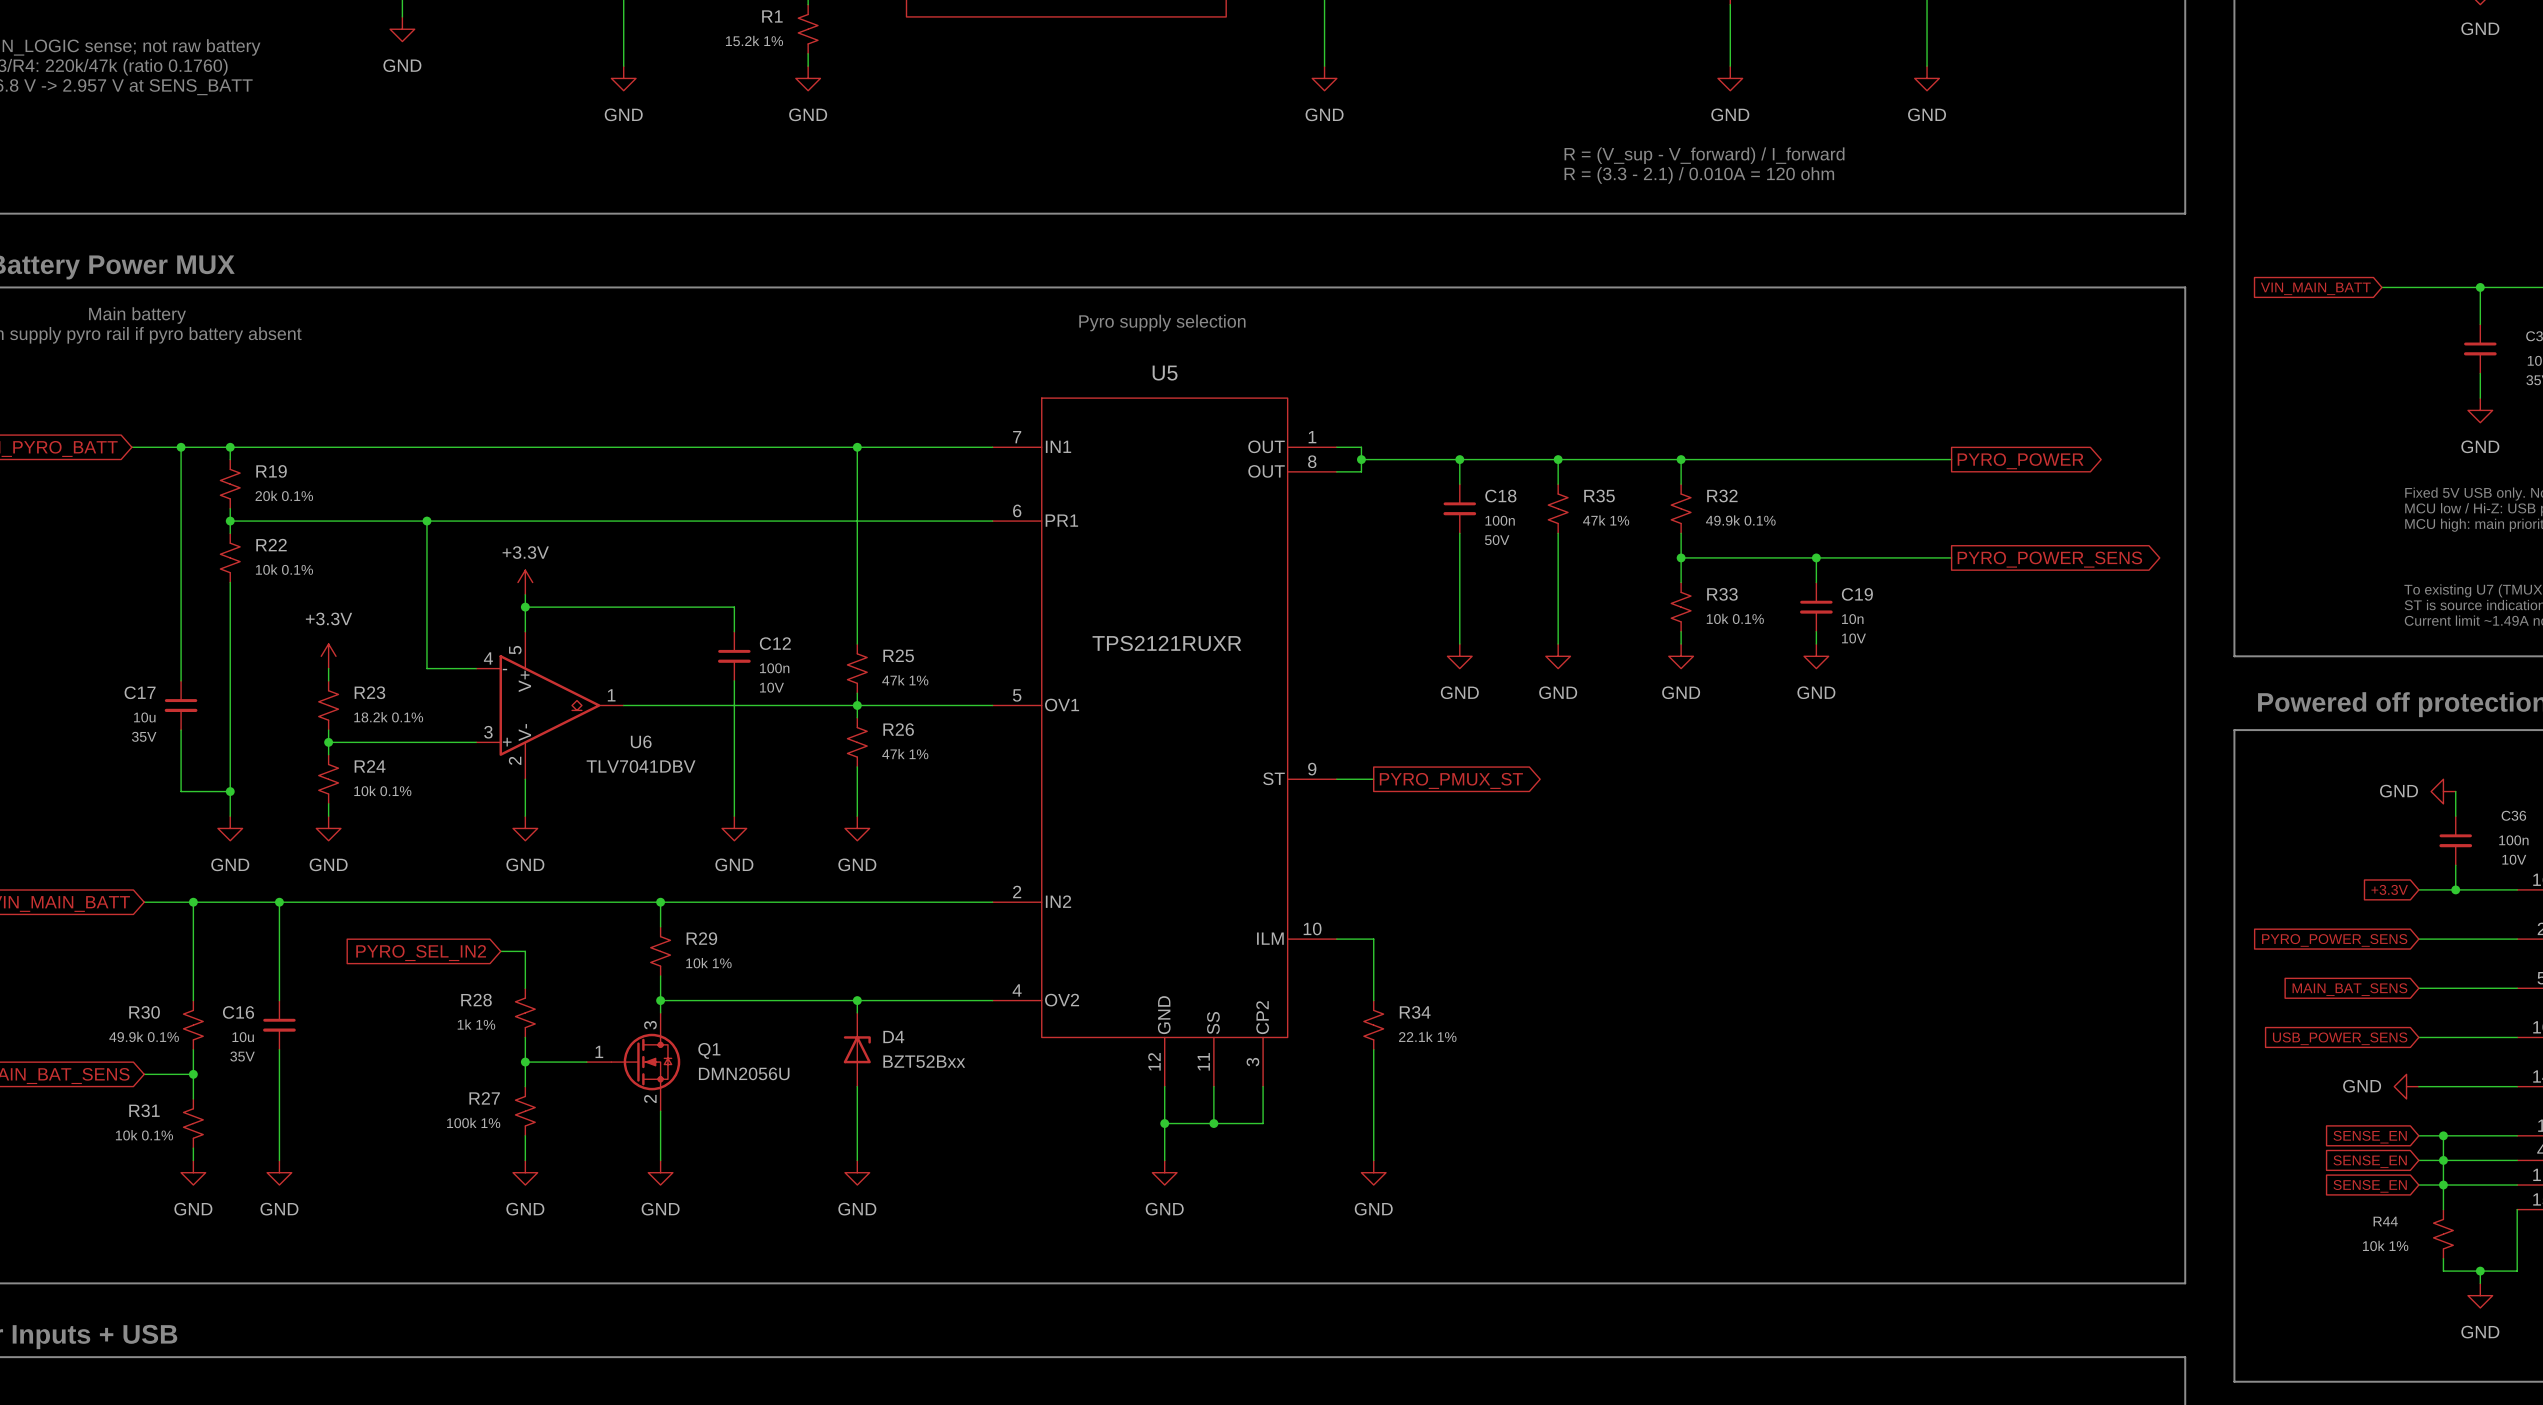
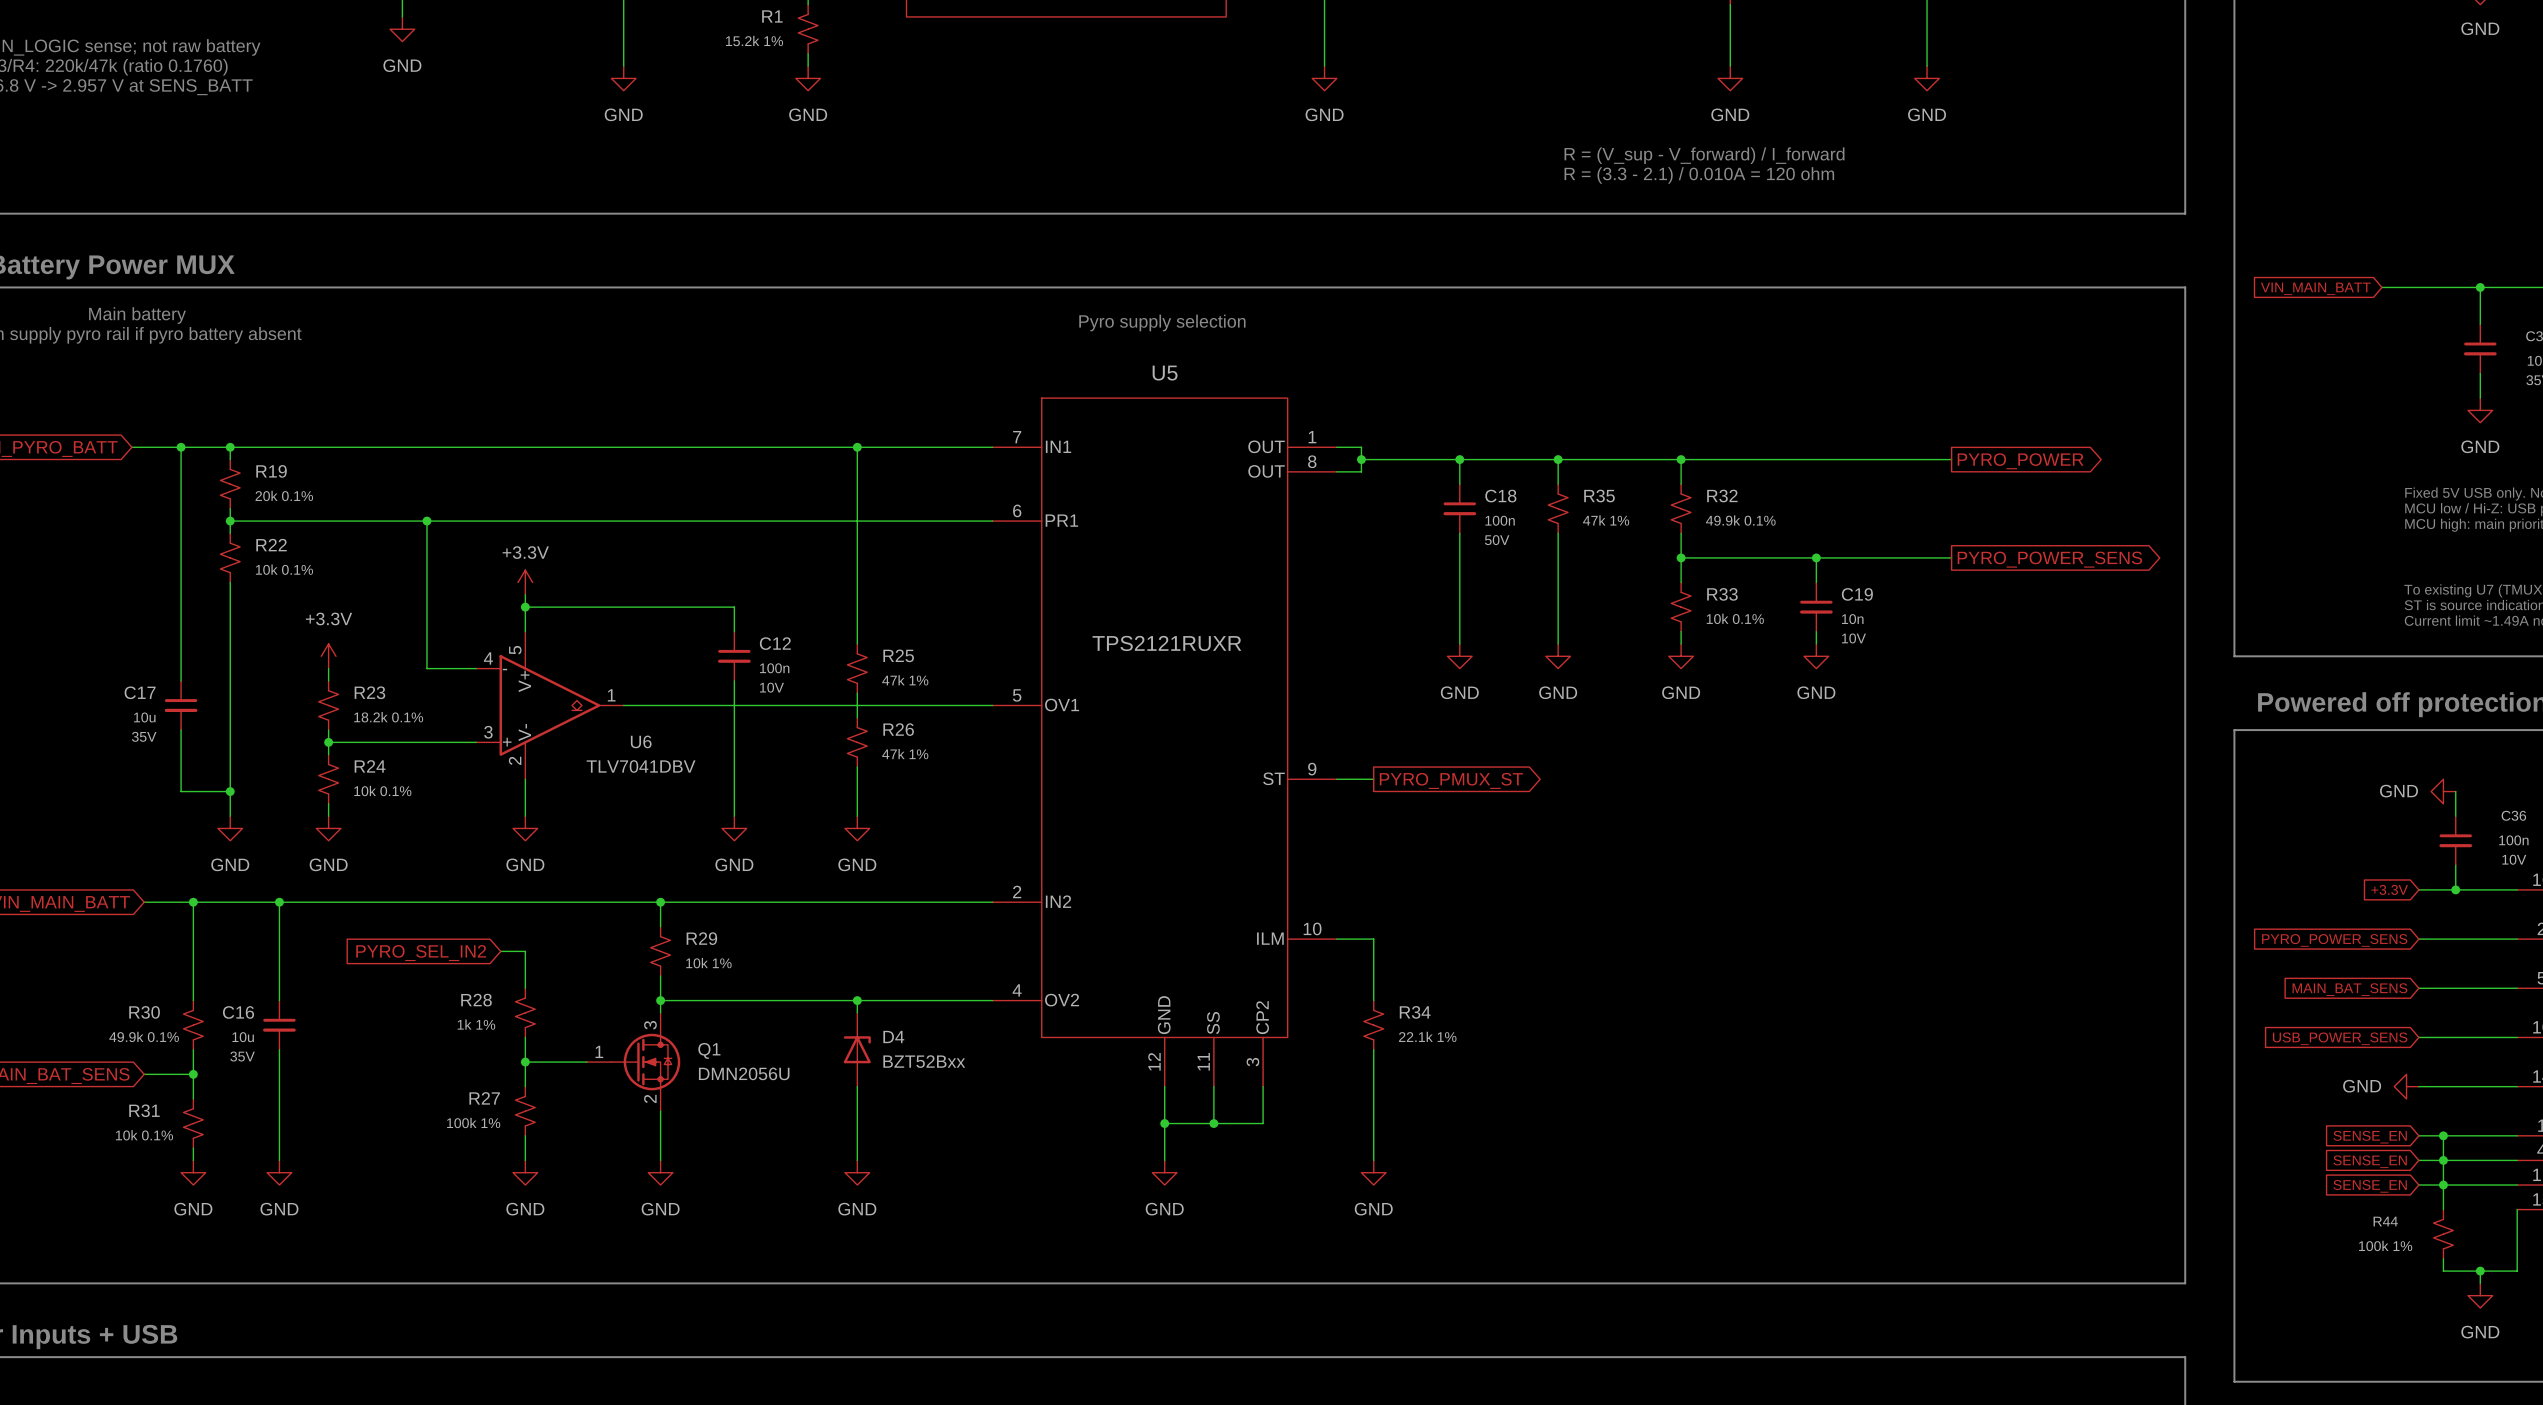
junction: (857, 705) -> none
R44 value: 10k 1% (2385, 1245) -> 100k 1% (2385, 1245)

